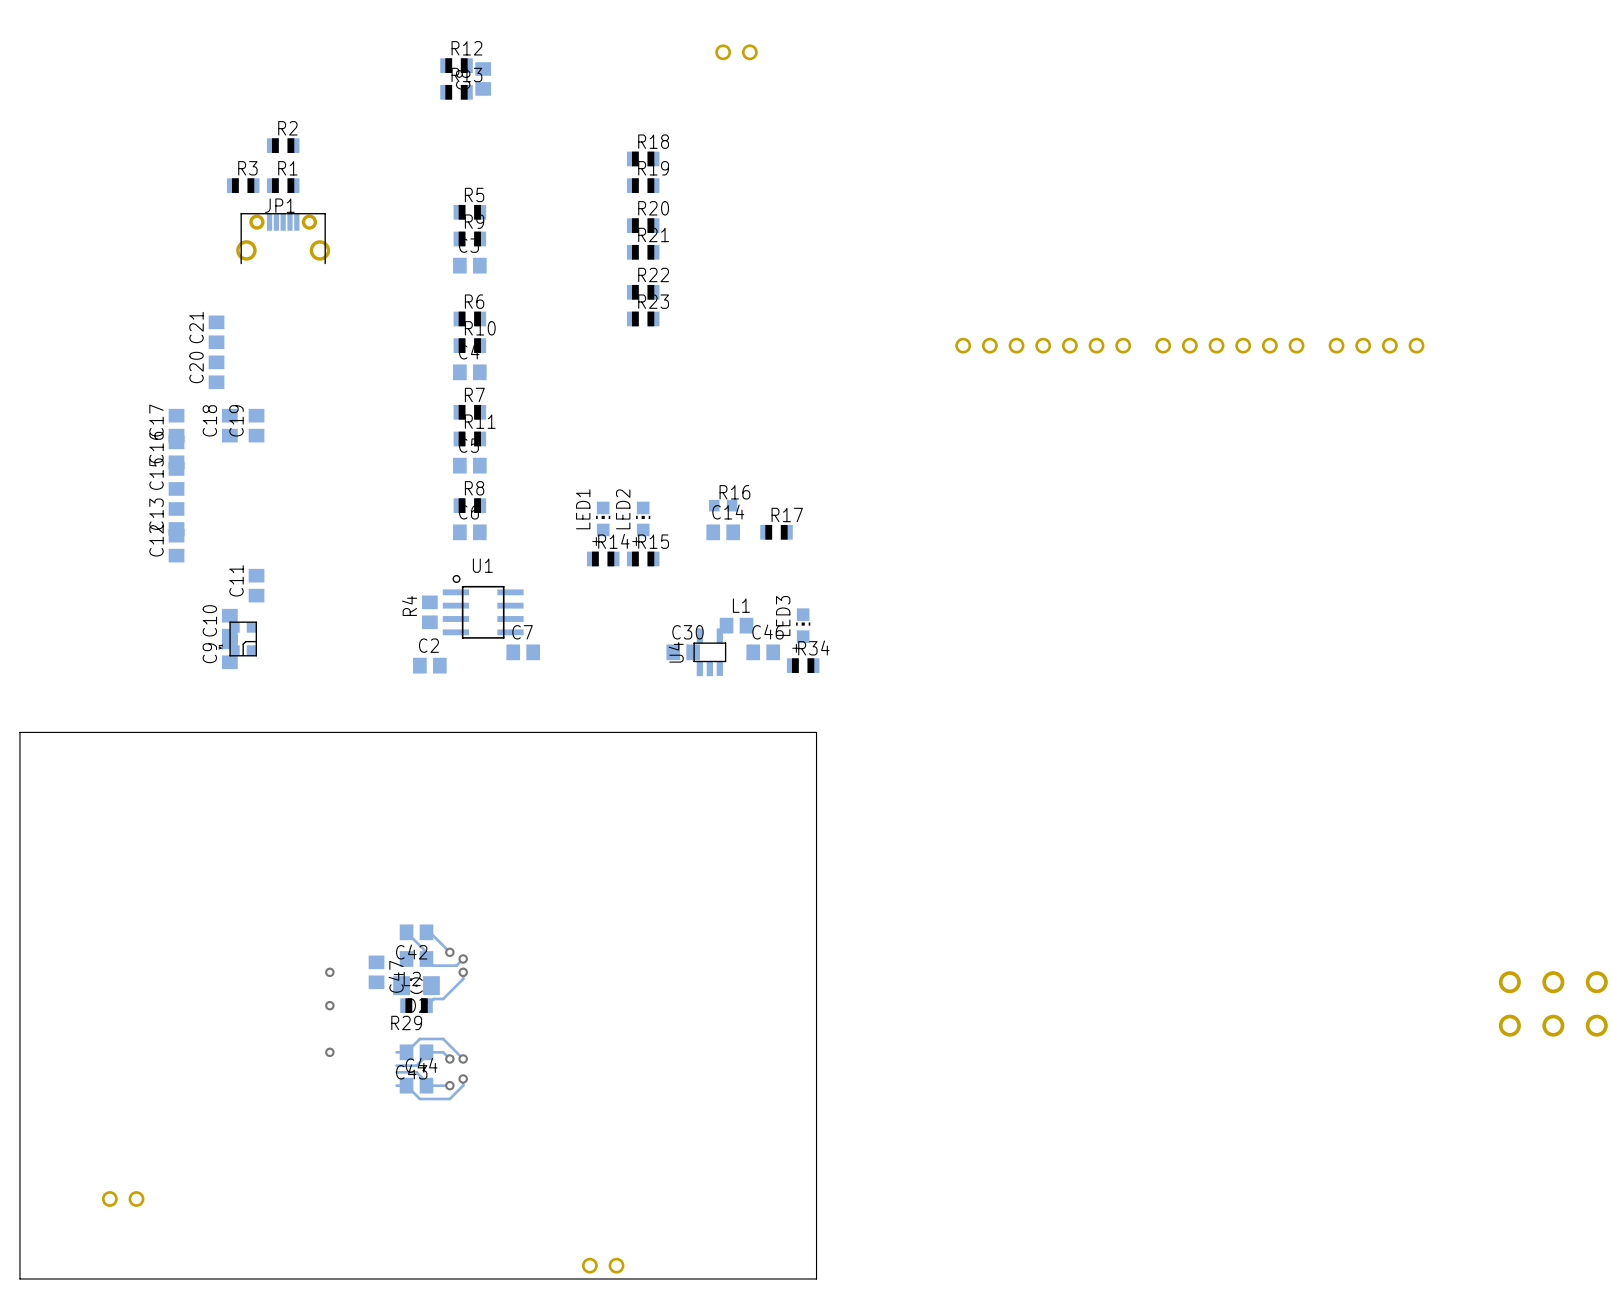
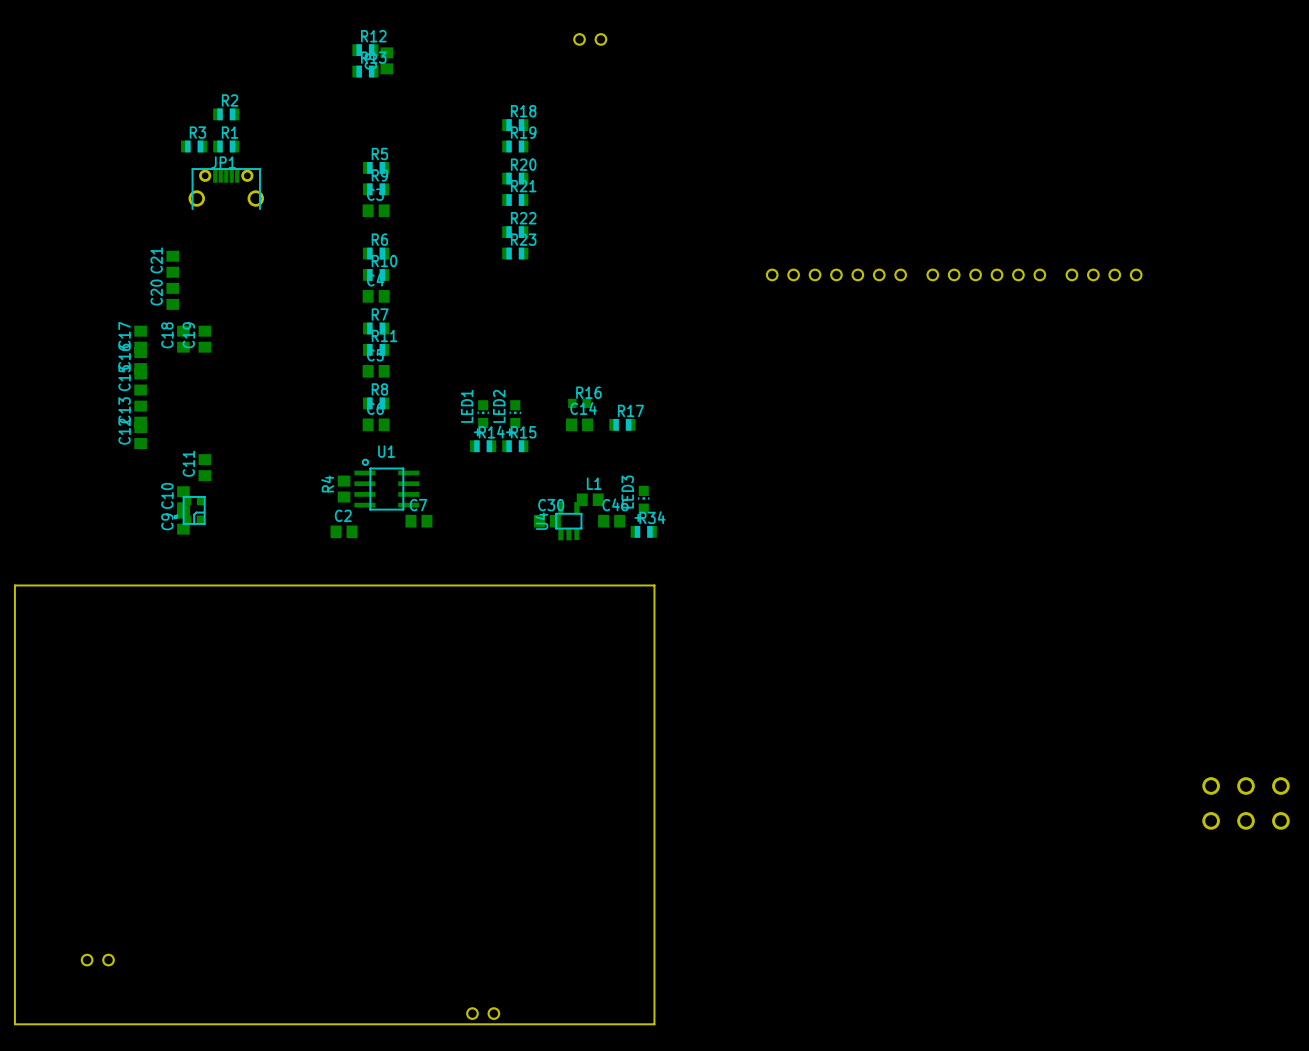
track: (406, 932) (426, 952) (426, 958) (433, 965) (456, 965) (463, 958) -> none
C42: (416, 932) -> none
track: (426, 932) (429, 932) (449, 952) -> none
via: (449, 952) -> none
L2: (416, 958) -> none
via: (463, 958) -> none
via: (329, 972) -> none
C47: (376, 972) -> none
track: (463, 972) (463, 978) (443, 998) (433, 998) (427, 1005) -> none
via: (463, 972) -> none
part: (416, 985) -> none
via: (329, 1005) -> none
R29: (416, 1005) -> none
via: (329, 1052) -> none
track: (396, 1052) (406, 1052) (419, 1038) (443, 1038) (463, 1058) -> none
C43: (416, 1052) -> none
track: (449, 1058) (443, 1052) (426, 1052) (426, 1055) (416, 1065) (396, 1065) -> none
via: (449, 1058) -> none
via: (463, 1058) -> none
track: (396, 1072) (416, 1072) (426, 1082) (426, 1085) (449, 1085) -> none
track: (463, 1078) (463, 1085) (449, 1098) (419, 1098) (406, 1085) (396, 1085) -> none
via: (463, 1078) -> none
C44: (416, 1085) -> none
via: (449, 1085) -> none

